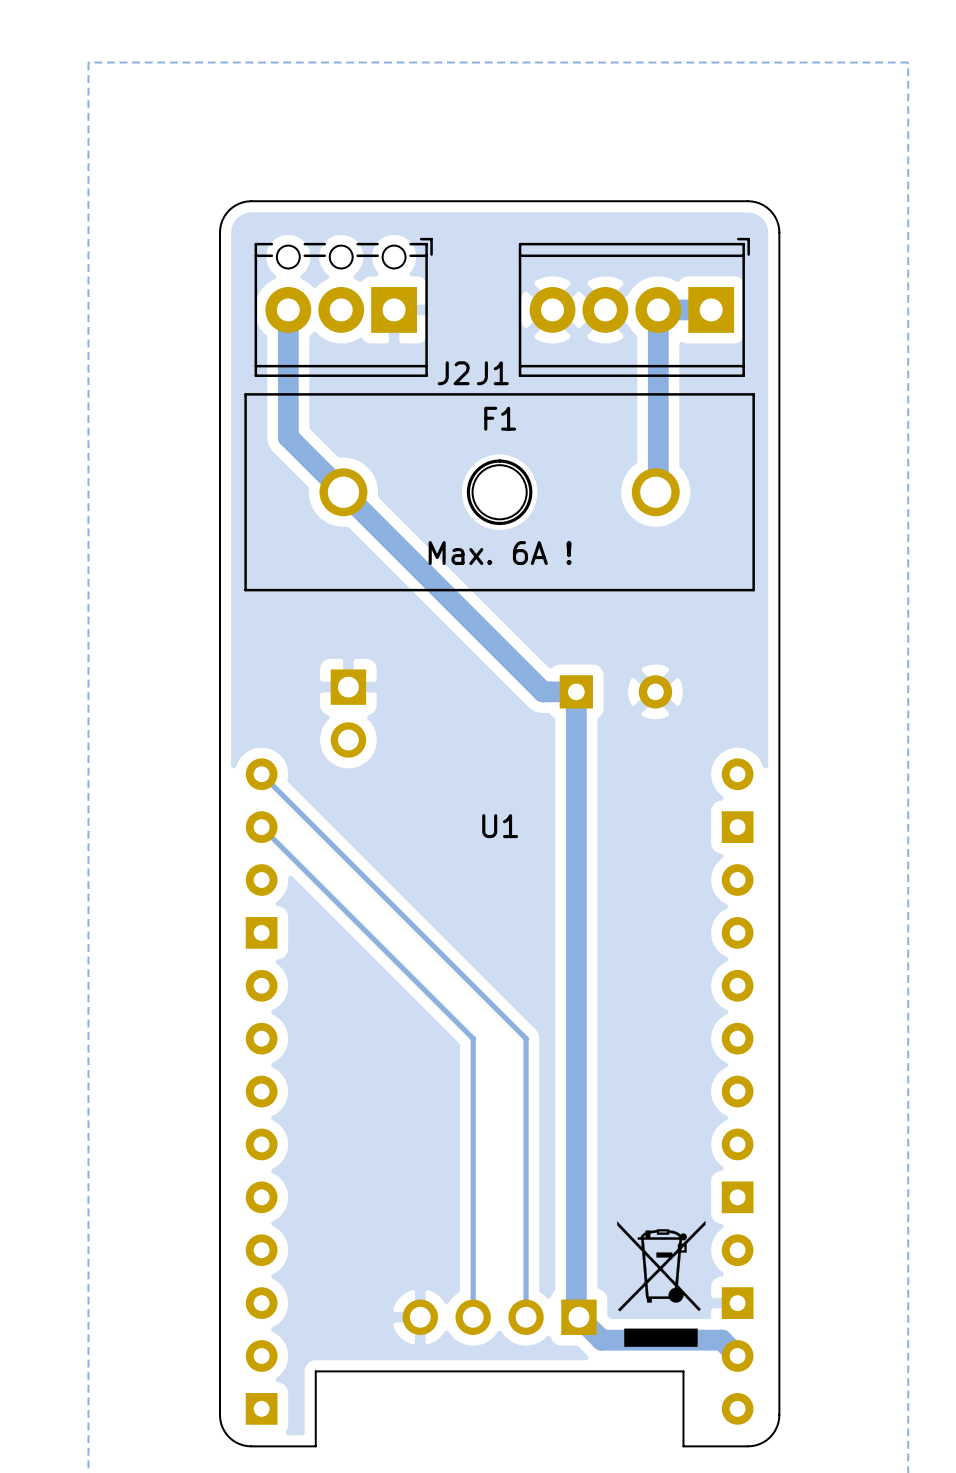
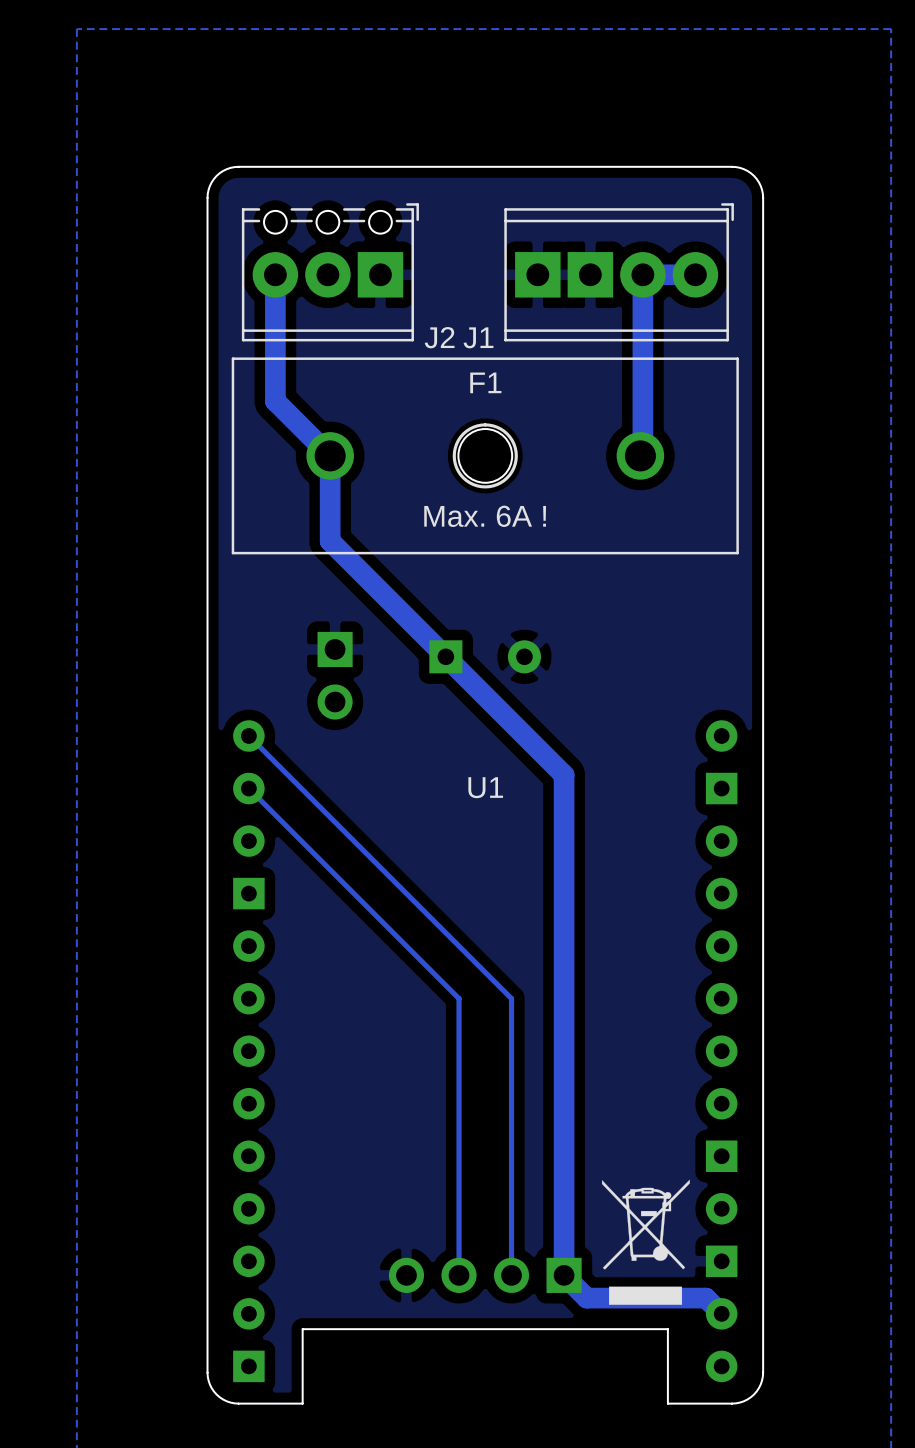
J1 footprint: [518, 237, 750, 377] -> [504, 203, 734, 342]
track: (343, 492) (543, 691) (576, 691) (576, 1314) -> (330, 455) (330, 541) (564, 775) (564, 1275)
part position: (615, 691) -> (485, 656)

